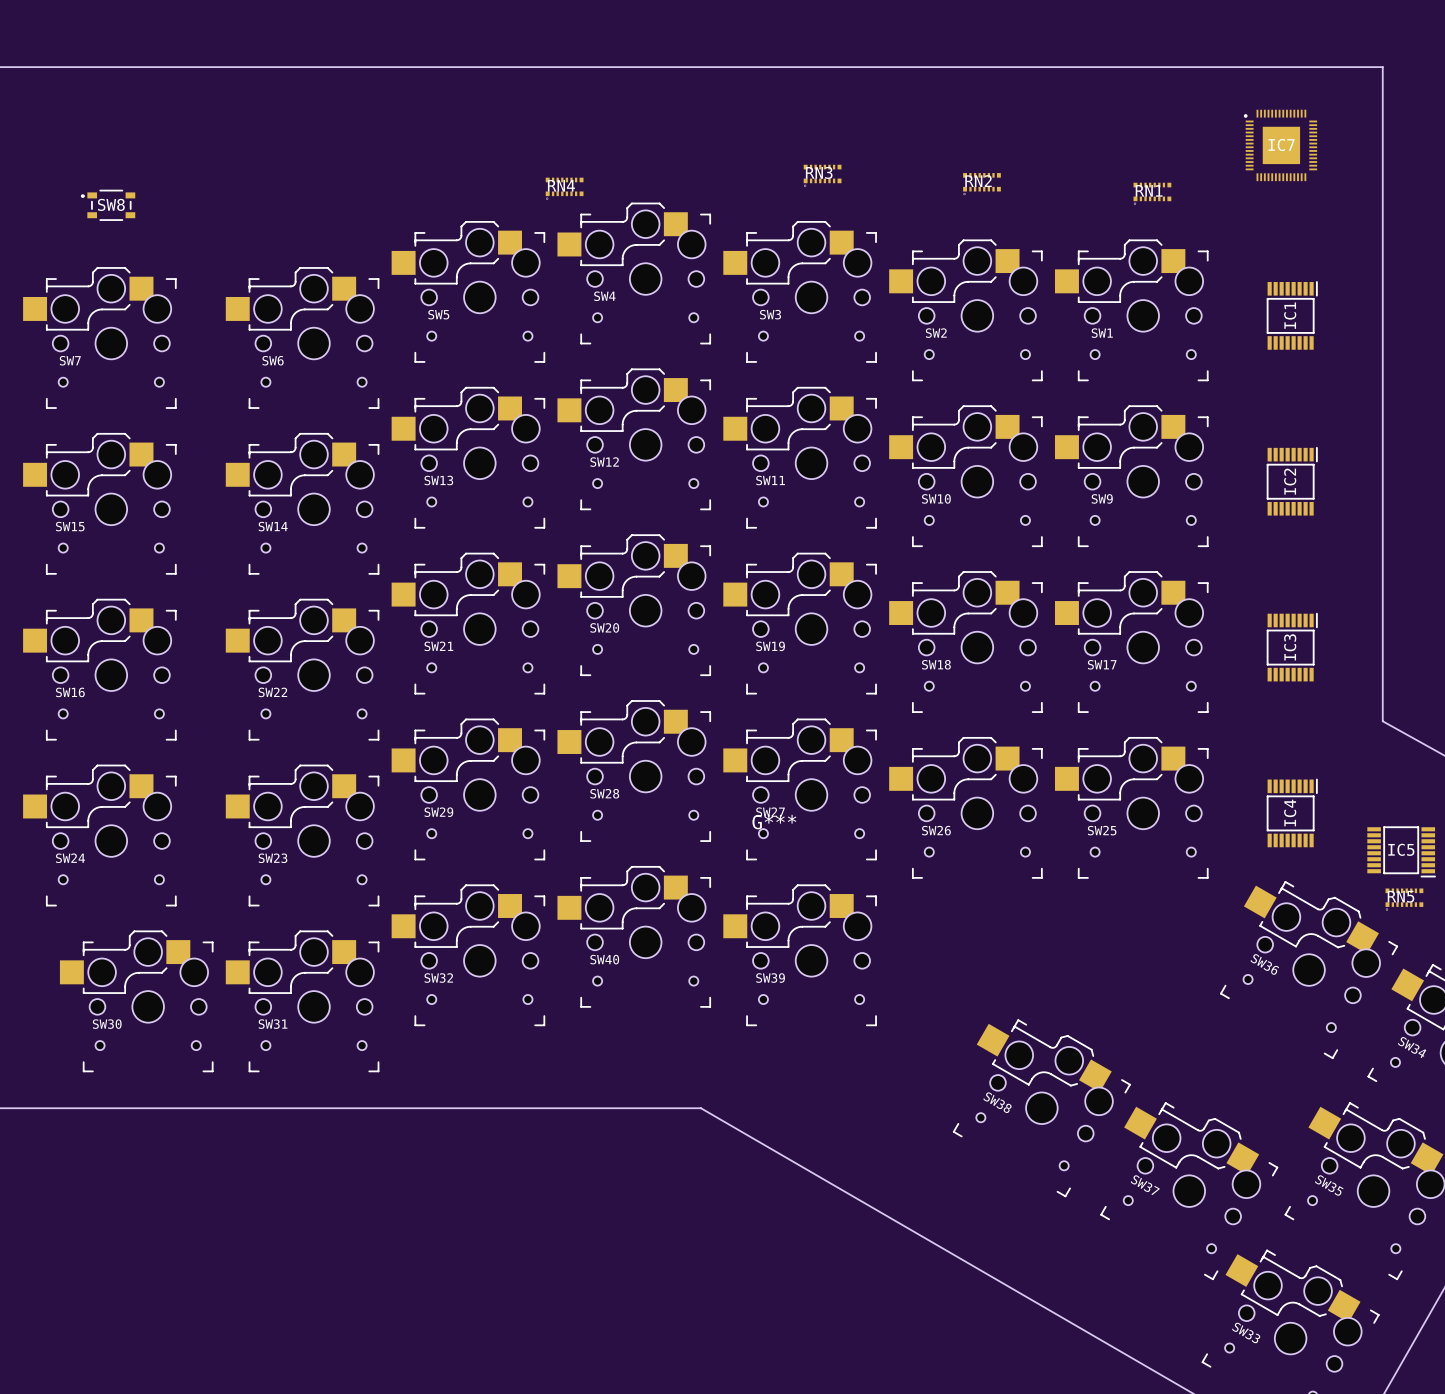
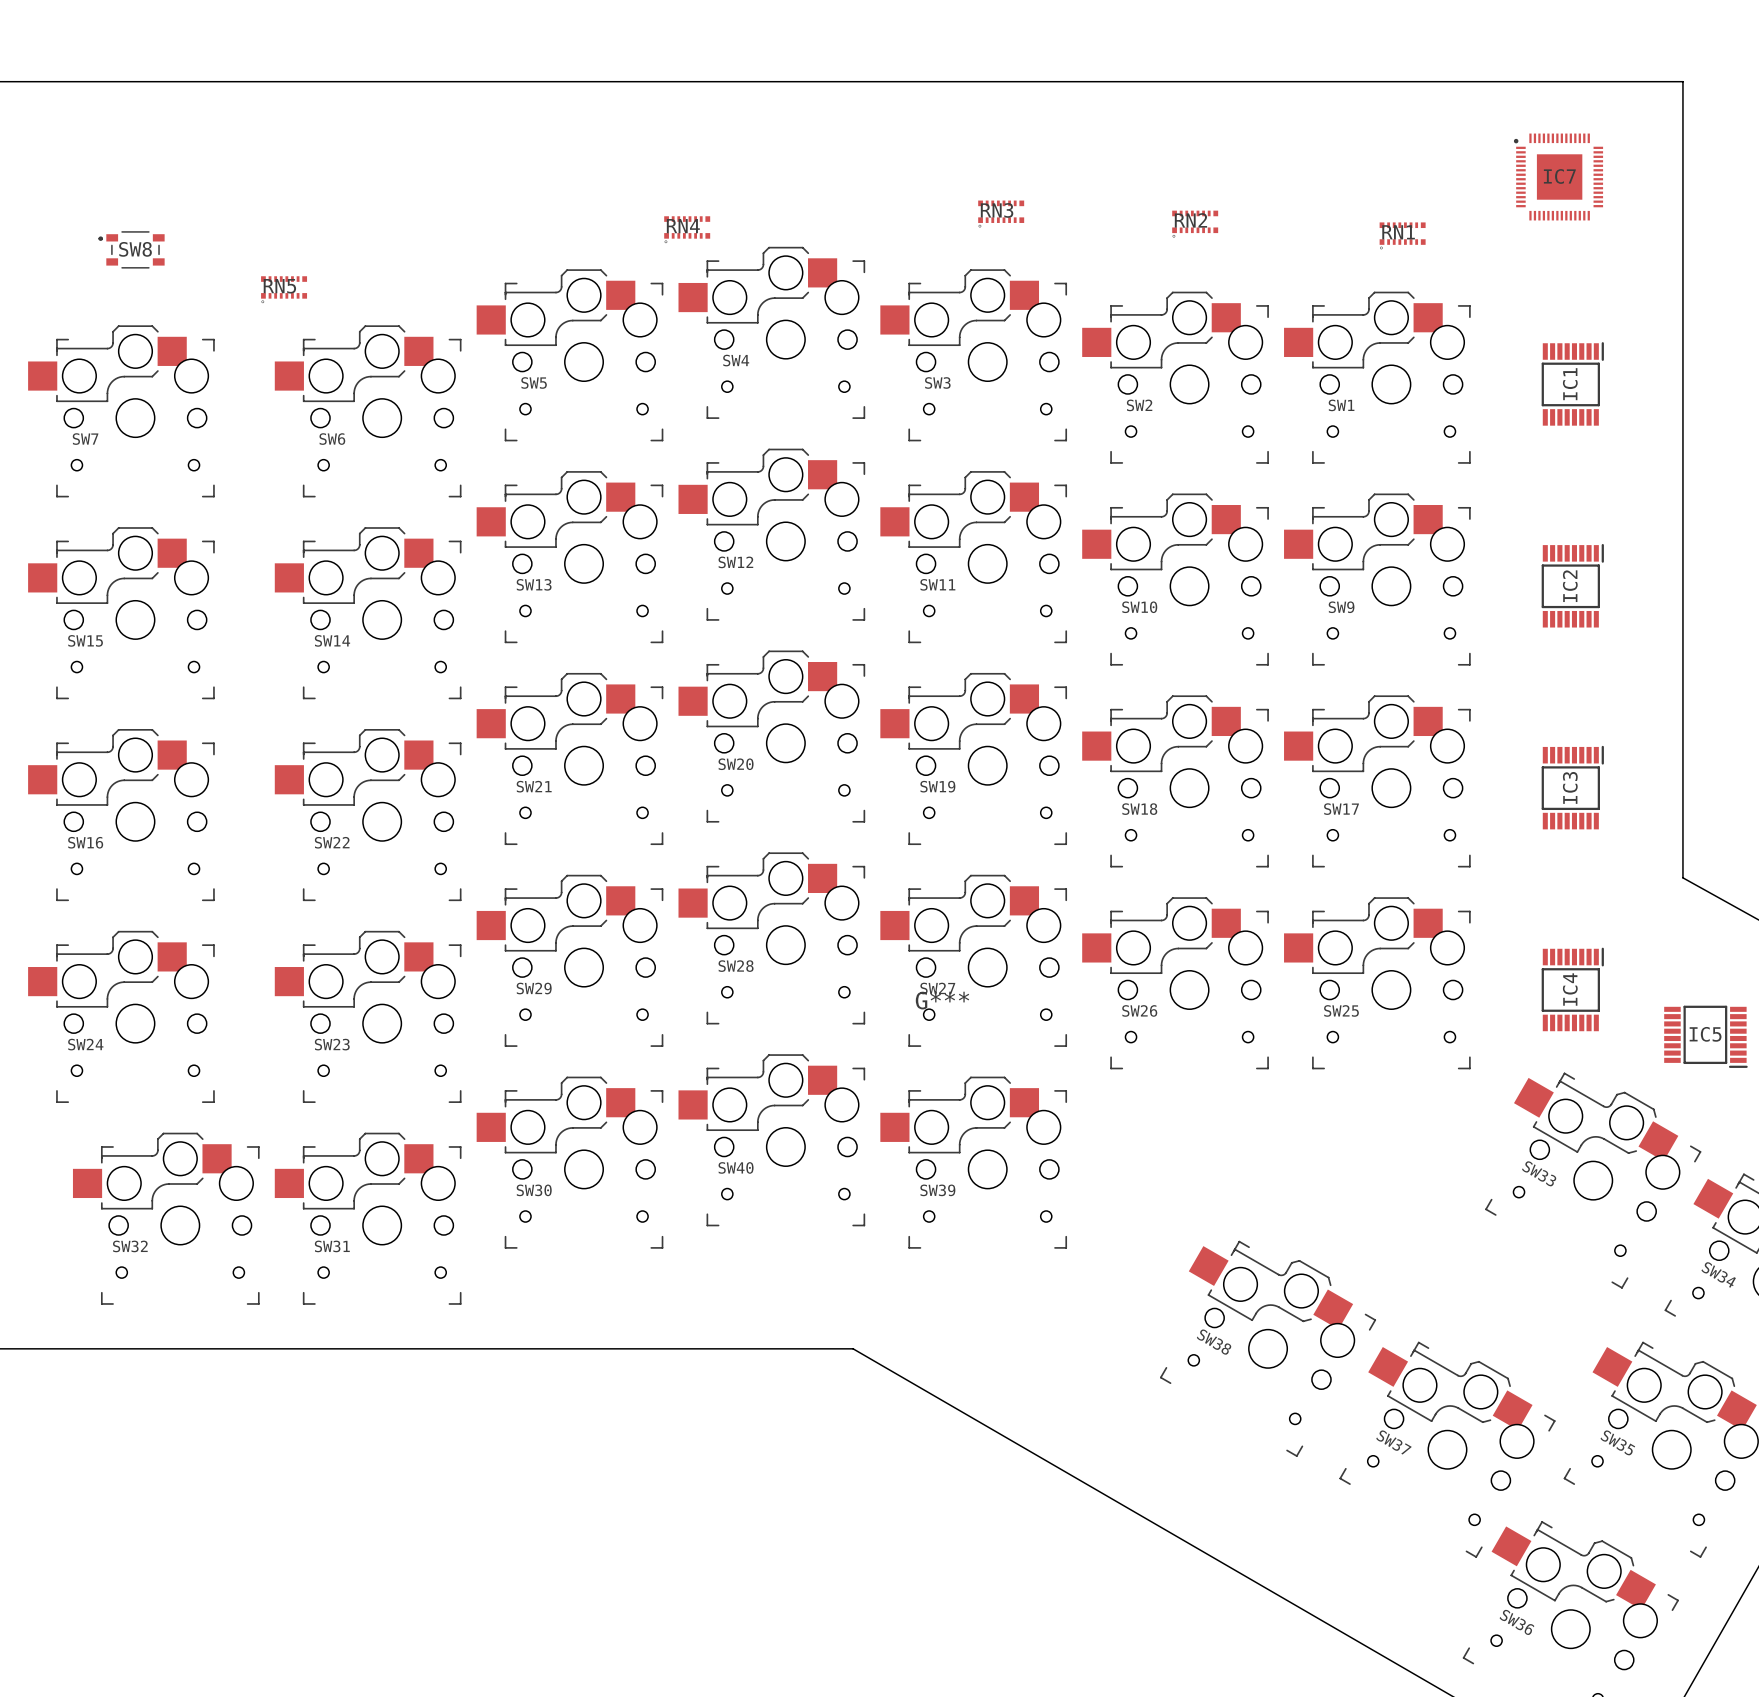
RN5 position: (1404, 899) -> (284, 289)
SW36 name: SW36 (1264, 964) -> SW33 (1539, 1173)
SW32 name: SW32 (438, 978) -> SW30 (534, 1190)
SW30 name: SW30 (107, 1024) -> SW32 (130, 1246)
SW33 name: SW33 (1246, 1332) -> SW36 (1516, 1622)

